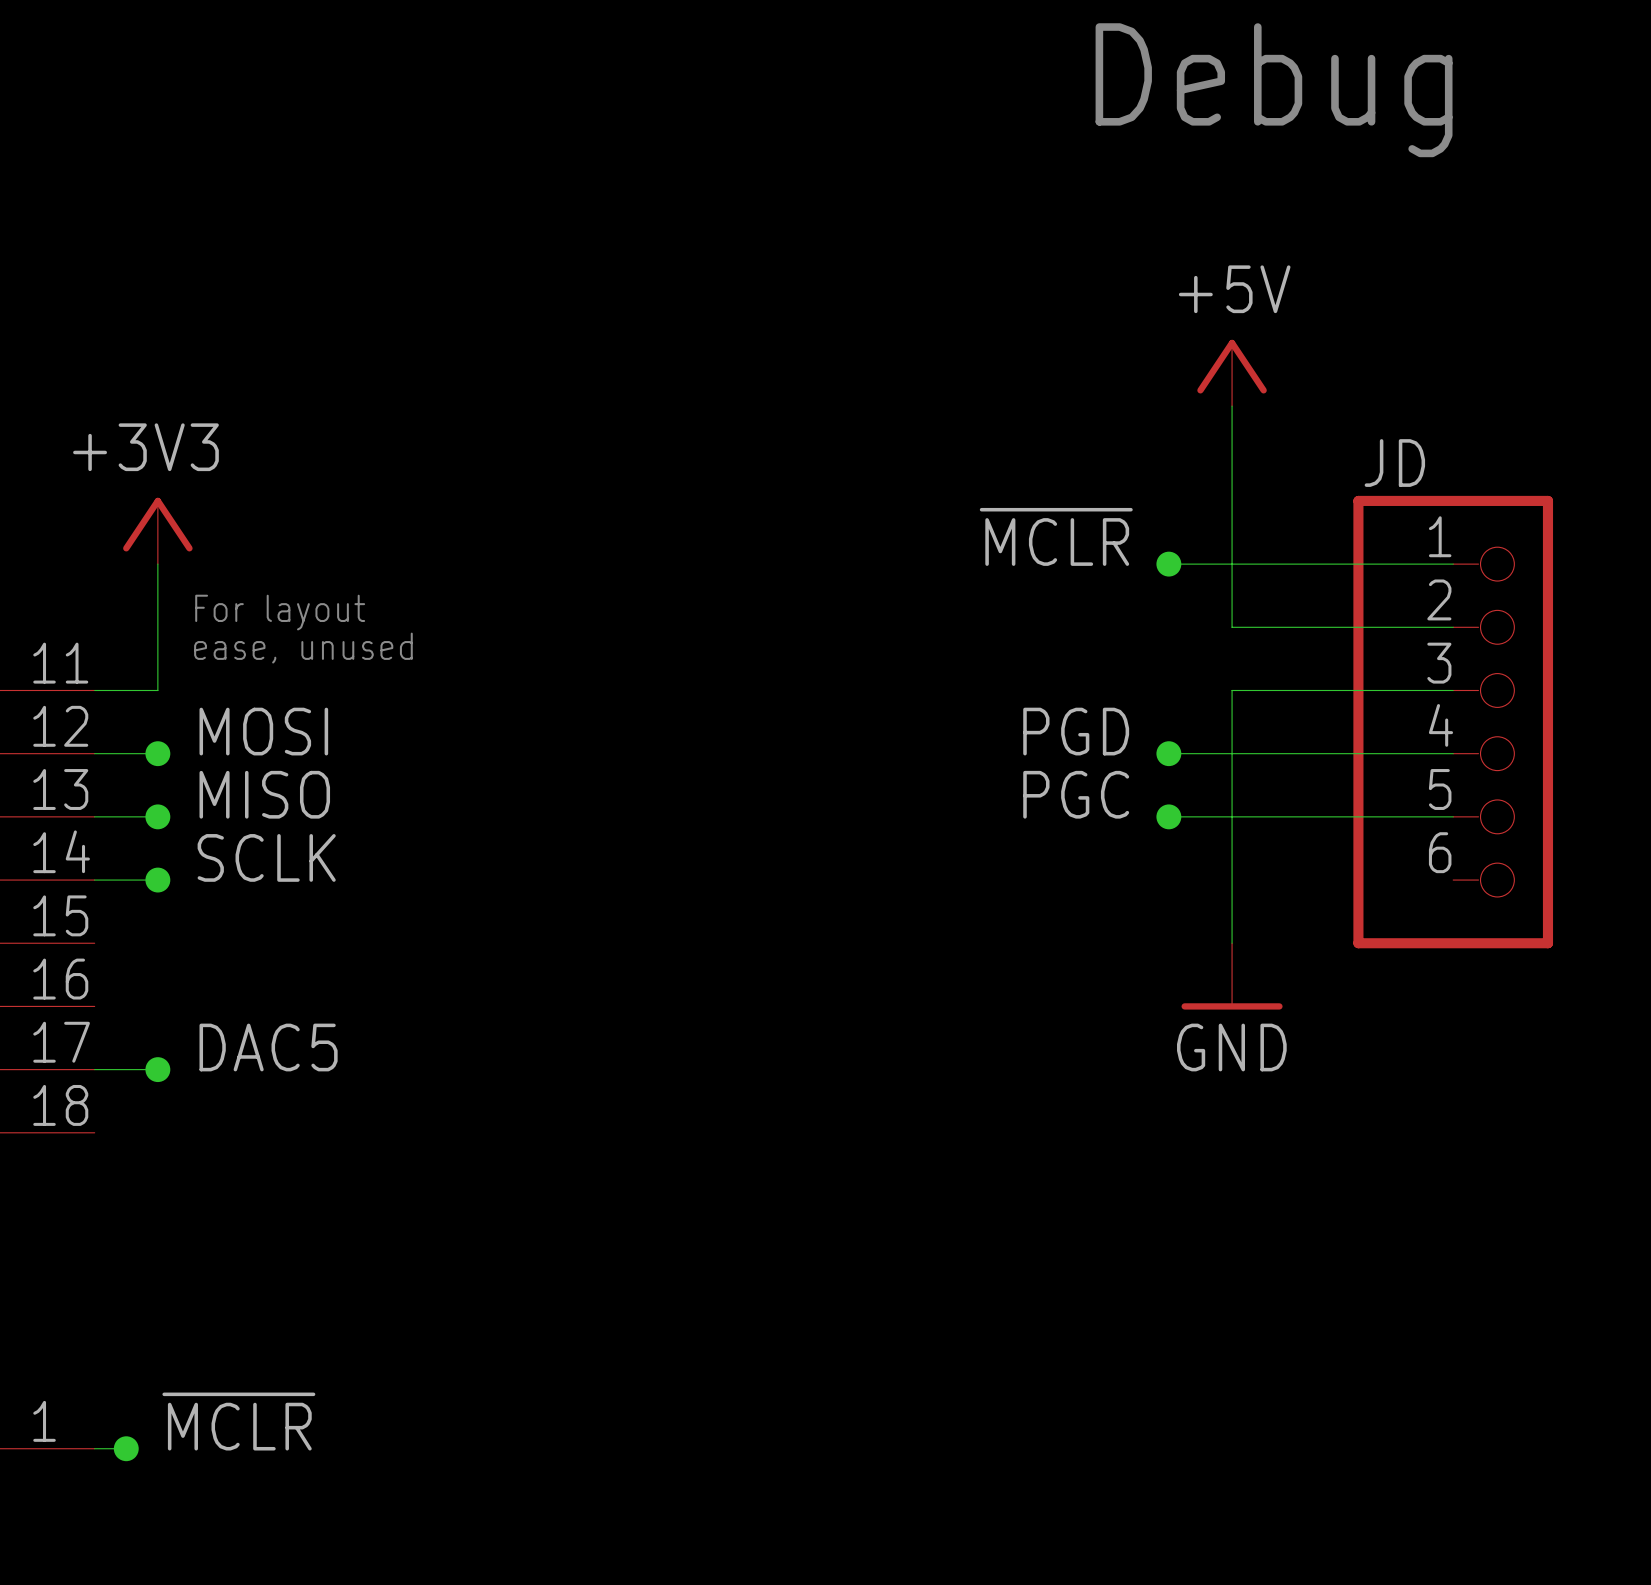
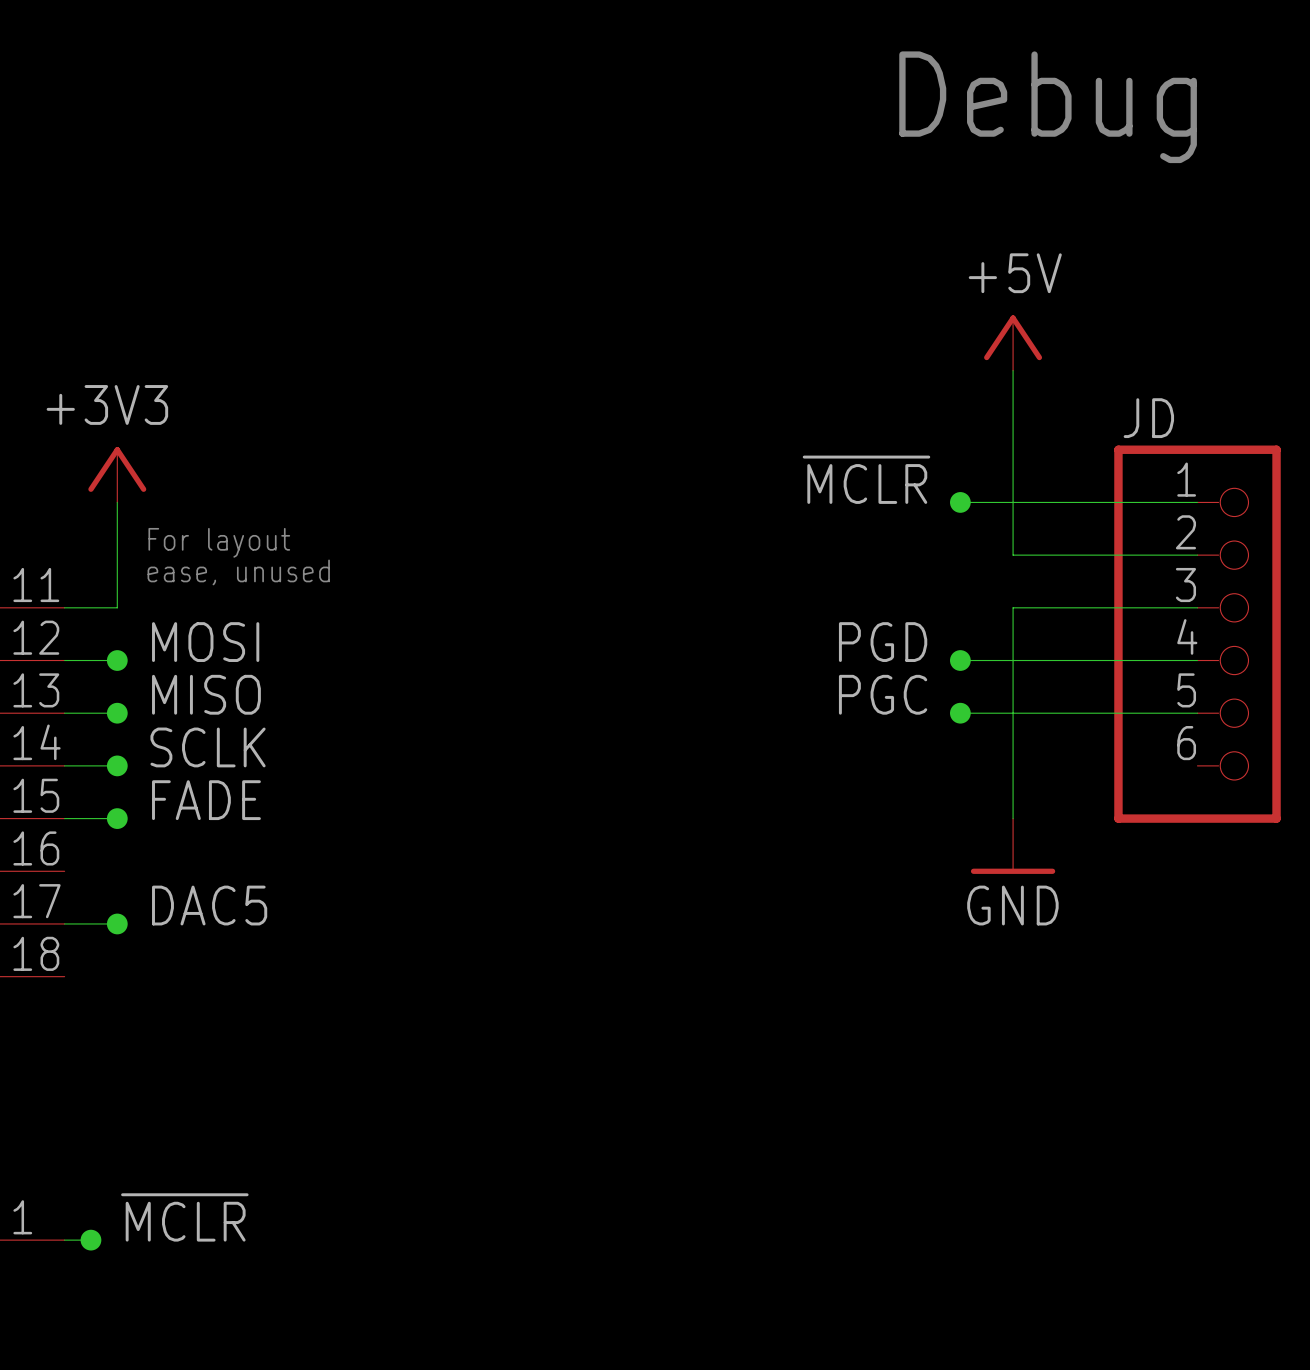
label: none -> FADE (206, 800)
wire: none -> (64, 818) (117, 818)
junction: none -> (117, 818)

